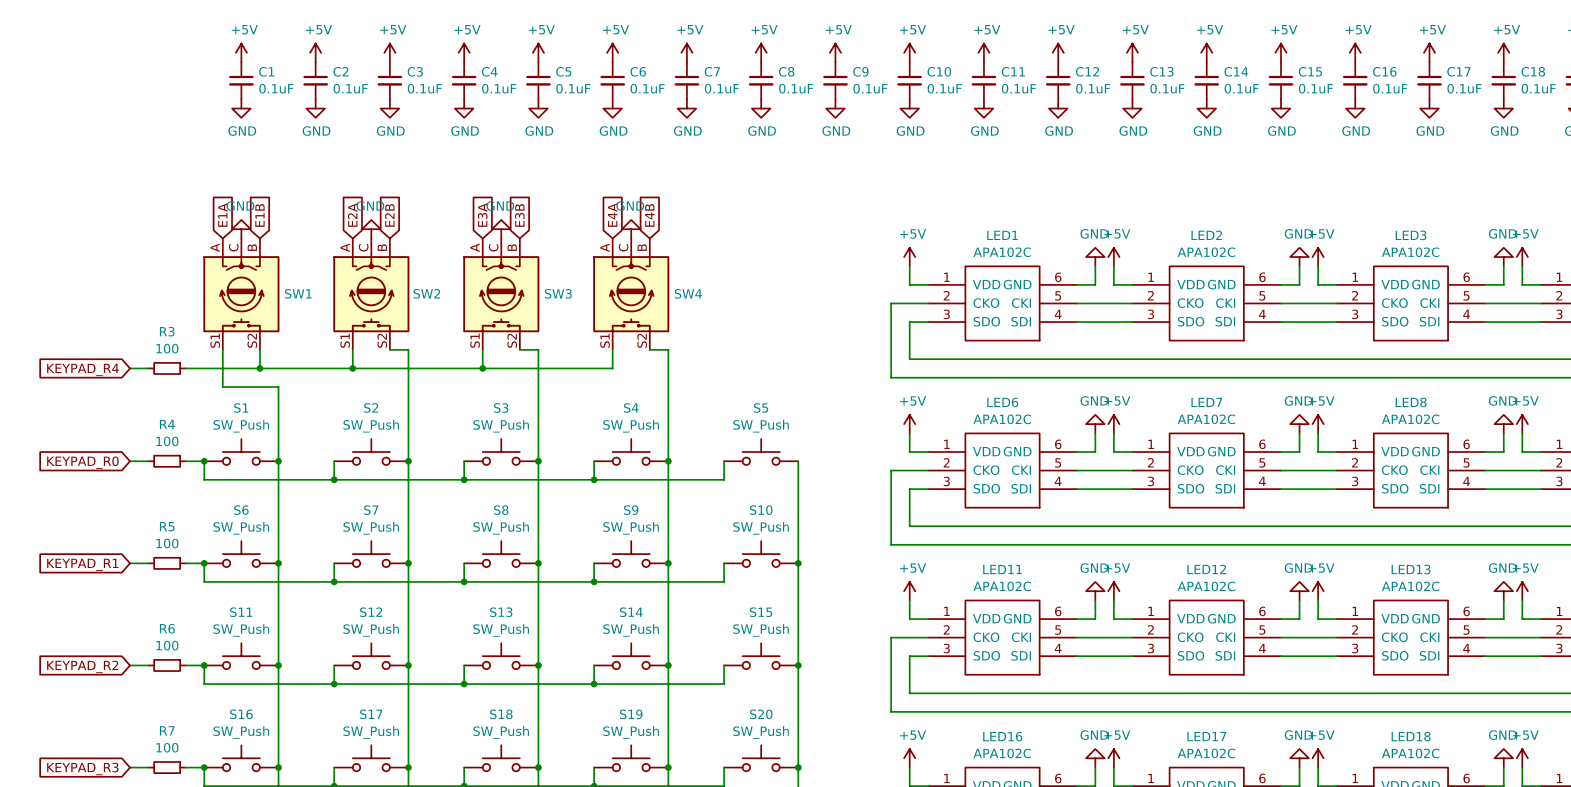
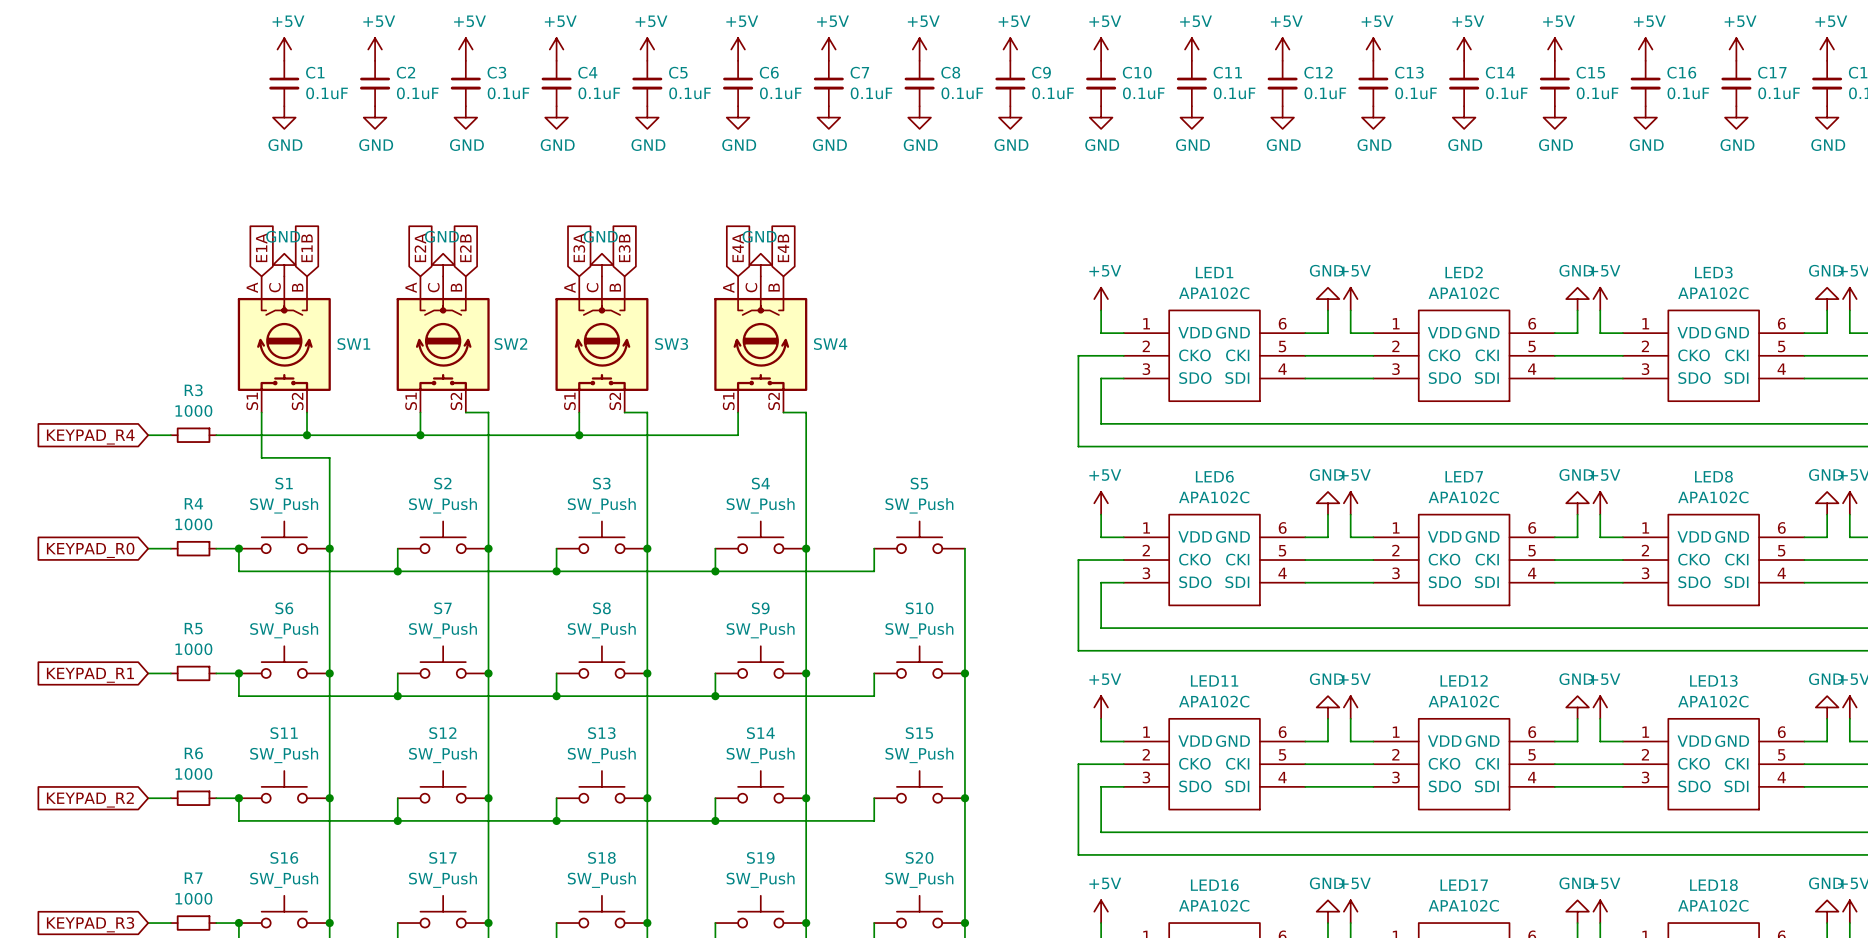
R3 value: 100 (167, 348) -> 1000 (193, 410)
R4 value: 100 (167, 441) -> 1000 (193, 524)
R5 value: 100 (167, 543) -> 1000 (193, 649)
R6 value: 100 (167, 645) -> 1000 (193, 774)
R7 value: 100 (167, 747) -> 1000 (193, 898)

